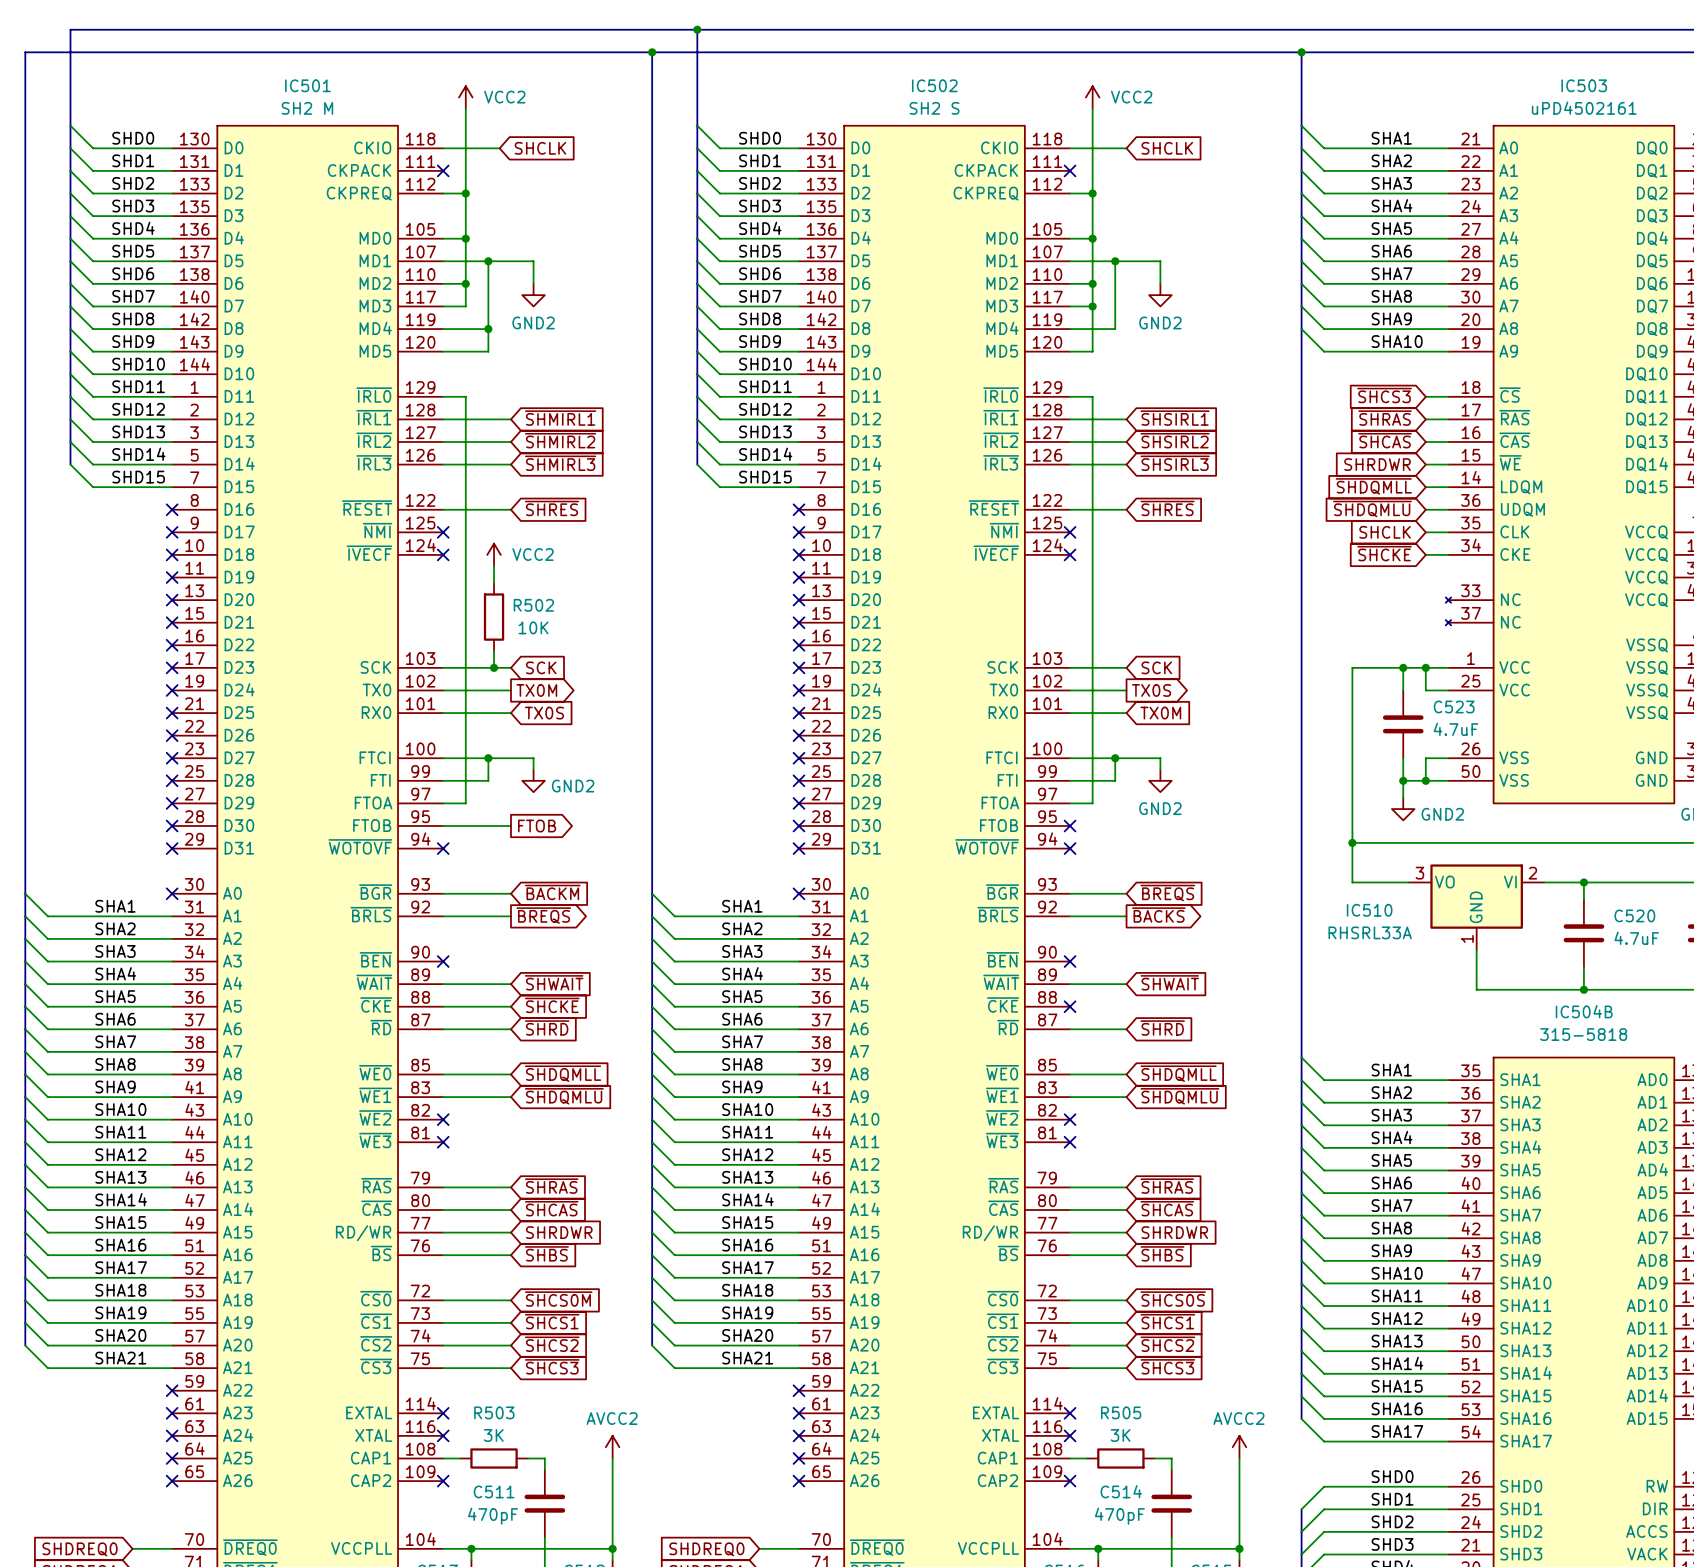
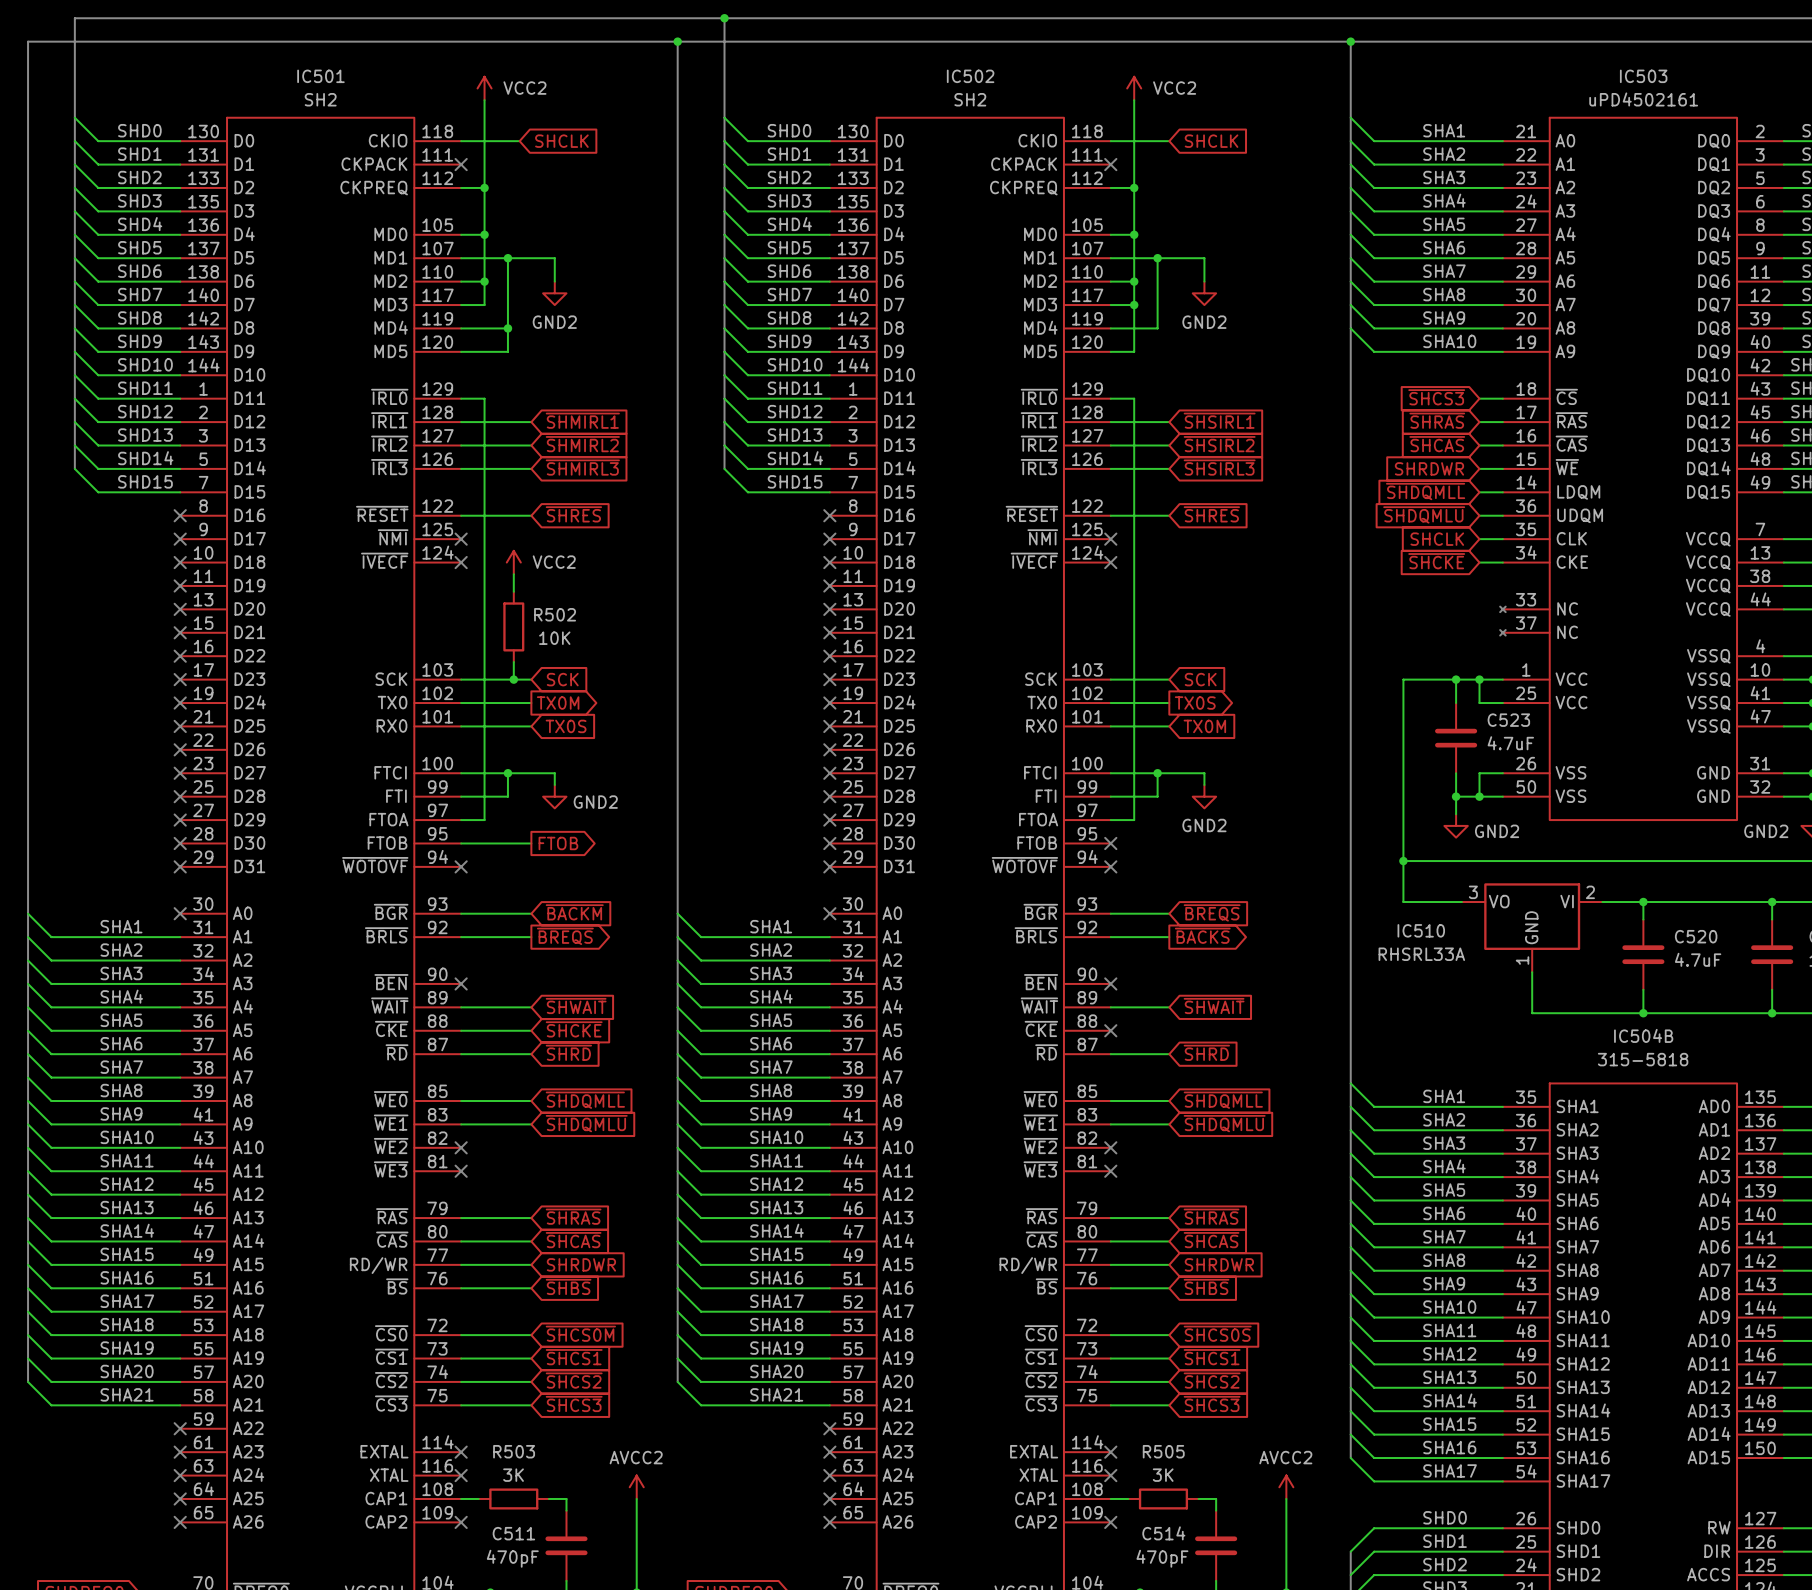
IC501 value: SH2 M (307, 108) -> SH2 (320, 99)
IC502 value: SH2 S (934, 108) -> SH2 (970, 99)

